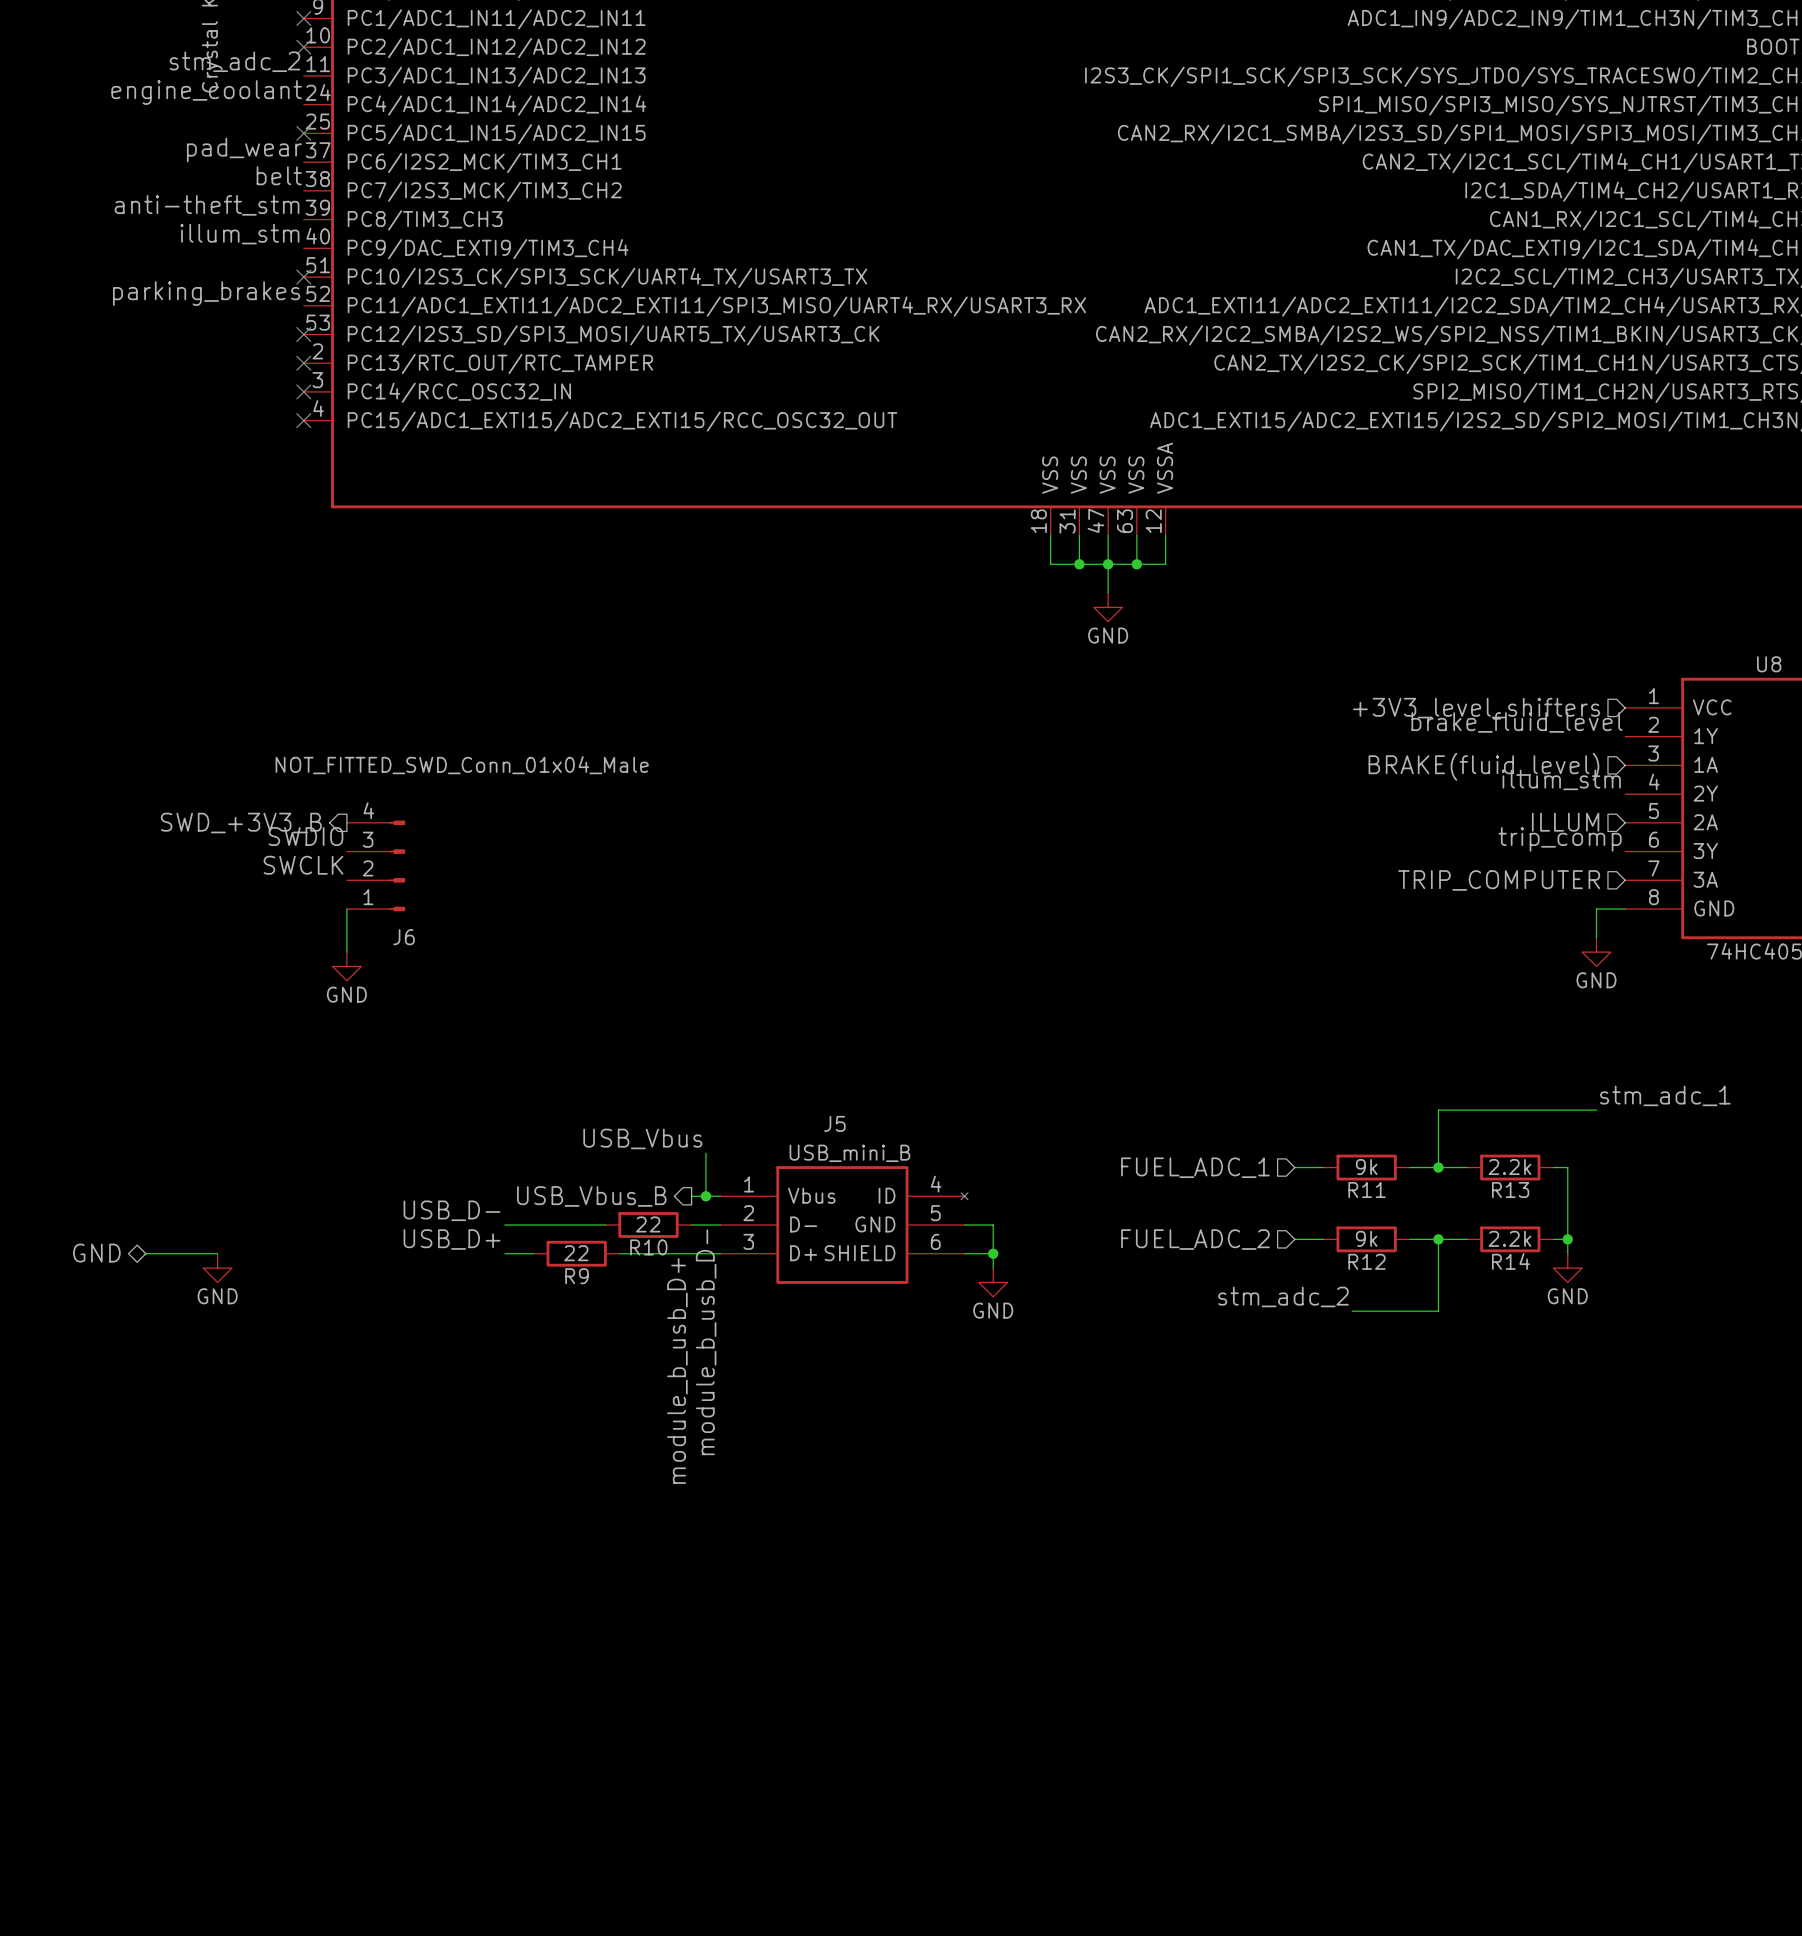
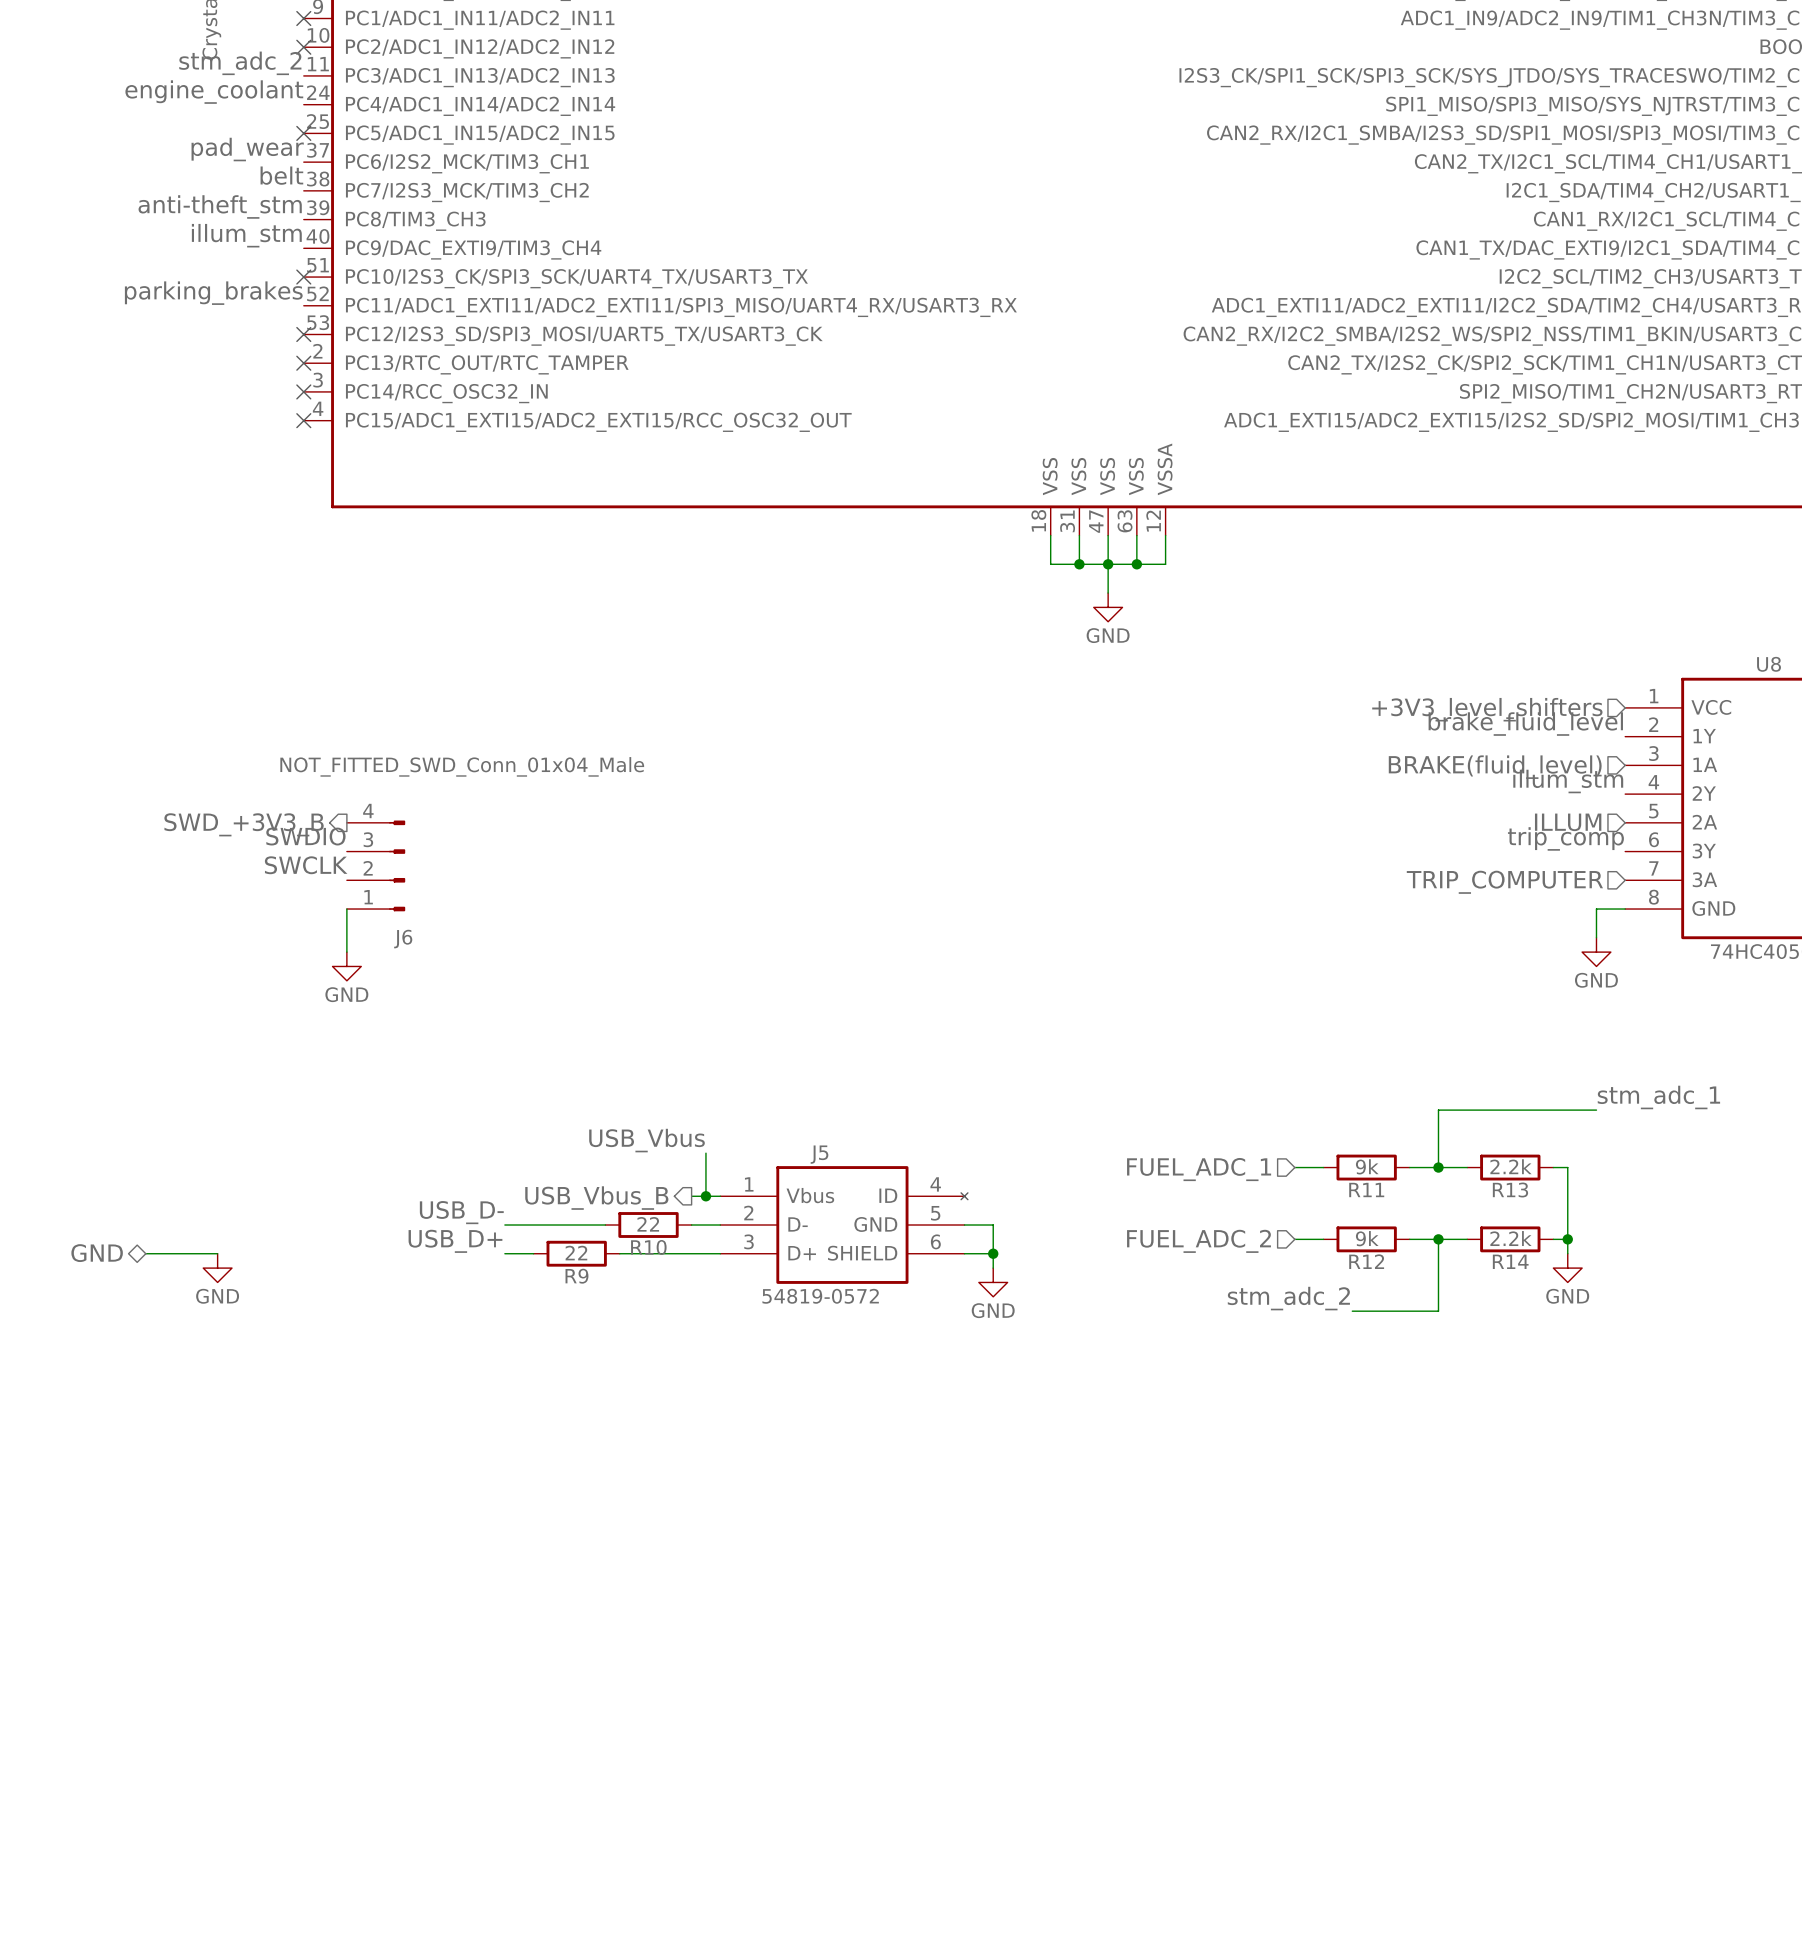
J5 name position: J5 (834, 1123) -> J5 (819, 1154)
J5 value: USB_mini_B (849, 1153) -> 54819-0572 (820, 1296)
label: module_b_usb_D- (706, 1342) -> none
label: module_b_usb_D+ (677, 1371) -> none

